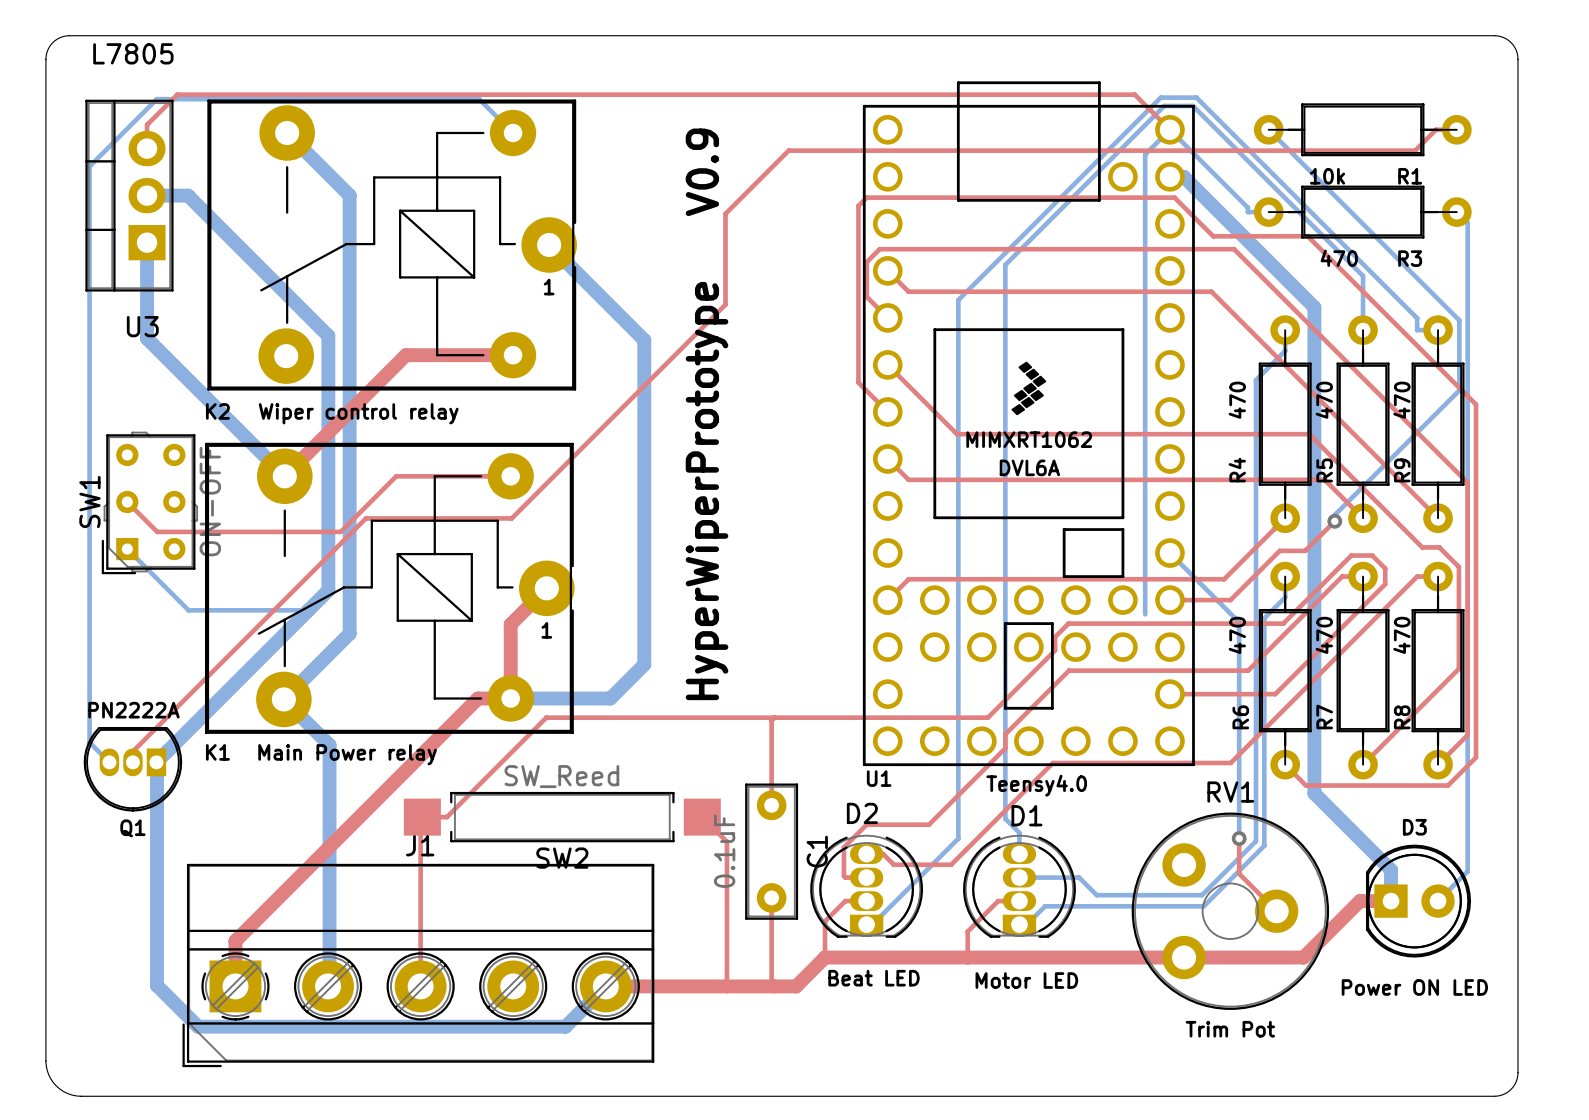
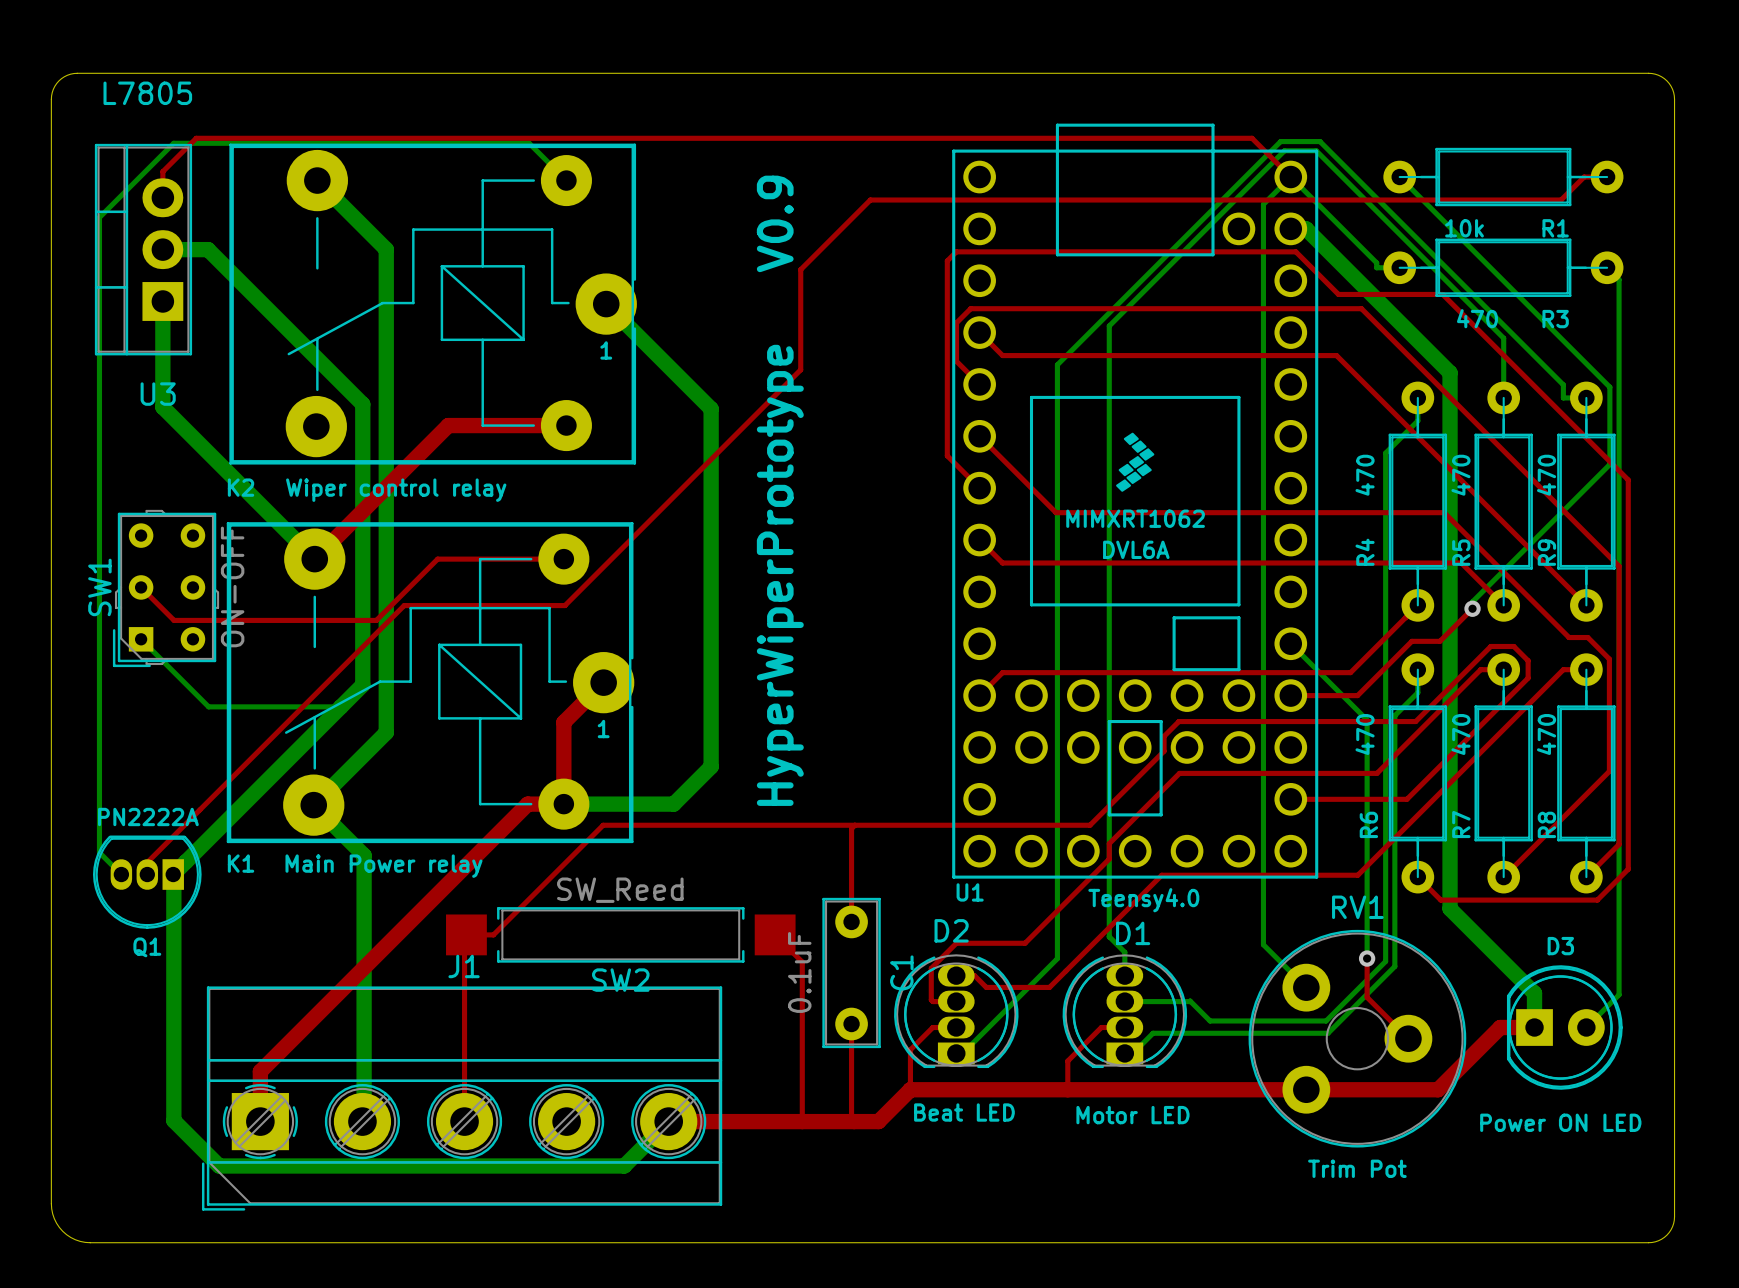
bottom track: none -> (1263, 711) (1263, 944) (1306, 987)

